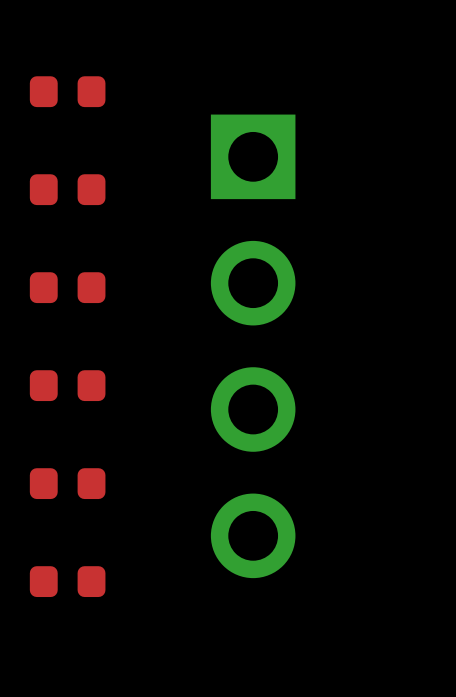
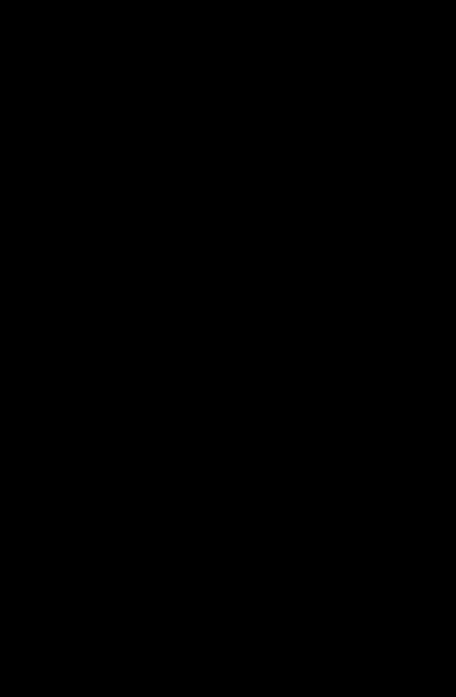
part: (67, 91) -> none
part: (67, 189) -> none
part: (67, 287) -> none
part: (253, 346) -> none
part: (67, 385) -> none
part: (67, 483) -> none
part: (67, 581) -> none

